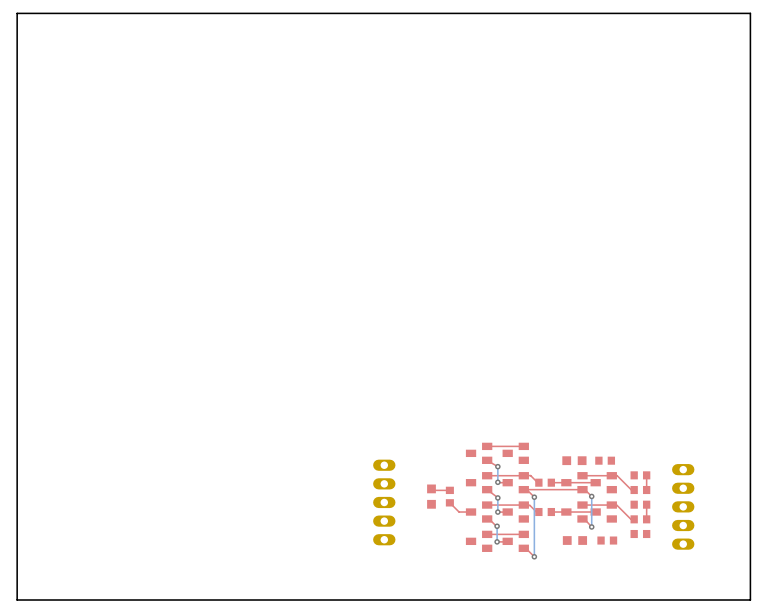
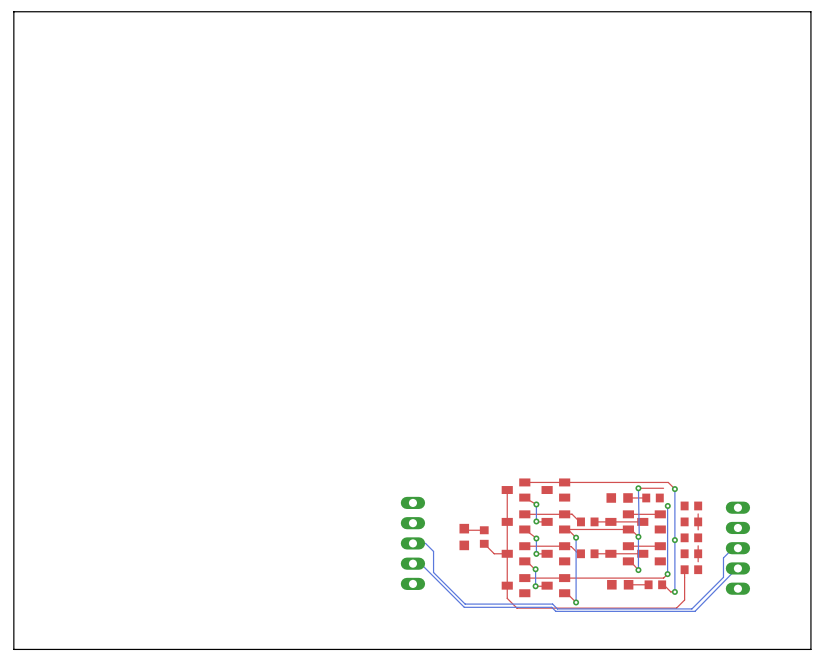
top track: none -> (564, 482) (668, 482) (674, 489)
bottom track: none -> (638, 488) (638, 536)
via: none -> (638, 488)
top track: none -> (663, 488) (638, 488)
bottom track: none -> (674, 489) (674, 591)
via: none -> (674, 489)
top track: none -> (507, 490) (507, 598) (516, 608) (676, 608) (684, 600) (684, 569)
top track: none -> (646, 497) (628, 497)
bottom track: none -> (667, 505) (667, 574)
via: none -> (667, 505)
part: none -> (691, 505)
top track: (611, 475) (617, 475) (631, 490) (634, 490) -> none
part: (640, 475) -> none
part: none -> (691, 521)
part: (640, 490) -> none
part: none -> (691, 537)
via: none -> (674, 540)
bottom track: none -> (412, 543) (425, 543) (433, 551) (433, 572) (465, 604) (552, 604) (557, 608) (691, 608) (723, 577) (723, 557) (733, 548) (739, 545)
part: (640, 504) -> none
top track: (611, 505) (617, 505) (631, 519) (634, 519) -> none
part: none -> (691, 553)
part: (640, 519) -> none
bottom track: none -> (412, 563) (420, 563) (464, 607) (551, 607) (555, 611) (695, 611) (739, 566)
part: none -> (691, 569)
top track: none -> (667, 574) (663, 578) (564, 578)
via: none -> (667, 574)
part: (640, 534) -> none
top track: none -> (648, 584) (628, 584)
top track: none -> (662, 584) (670, 591) (674, 591)
via: none -> (674, 591)

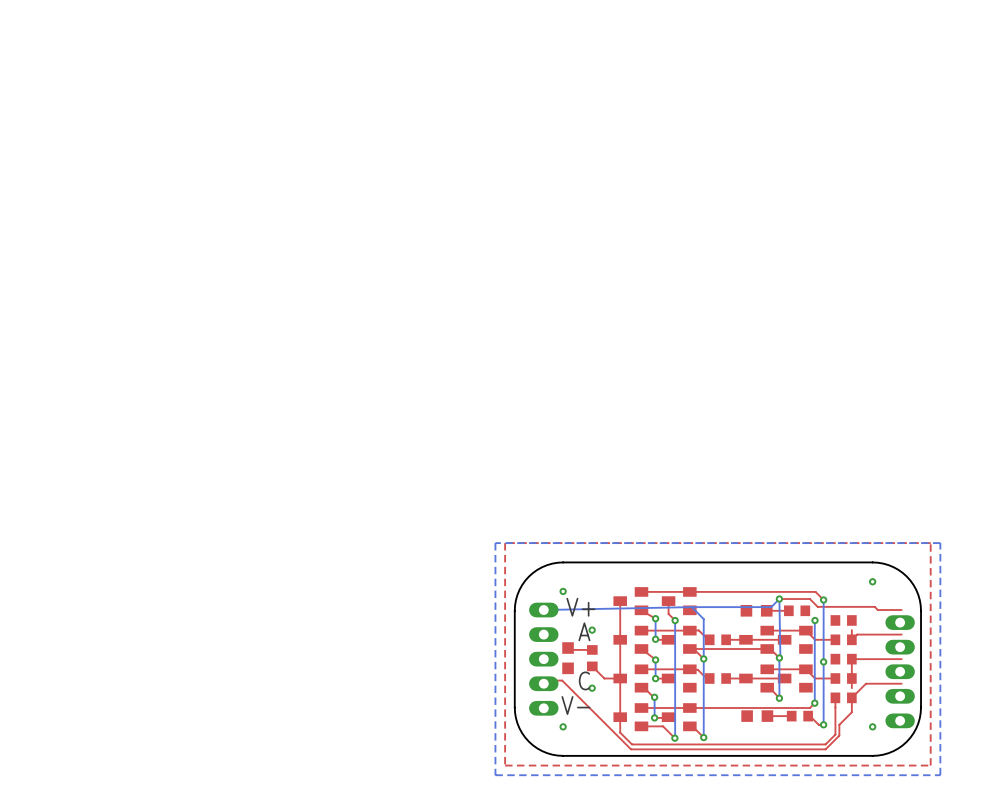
board edge: (810, 11) (13, 11) (13, 649) (810, 649) (810, 11) -> none
top zone outline: none -> (930, 543) (930, 765) (505, 765) (505, 543) (930, 543)
bottom zone outline: none -> (940, 543) (940, 775) (495, 775) (495, 543) (940, 543)
board edge: none -> (872, 562) (563, 562) (542, 567) (525, 580) (517, 594) (515, 605) (514, 707) (519, 728) (532, 745) (547, 753) (557, 755) (872, 755) (893, 751) (910, 737) (919, 718) (920, 605) (913, 585) (902, 572) (888, 565) (872, 562)
via: none -> (872, 581)
via: none -> (563, 591)
bottom track: none -> (779, 599) (771, 607) (691, 607)
top track: none -> (809, 599) (817, 606) (874, 606) (877, 610) (901, 610)
top track: none -> (668, 601) (668, 613) (675, 620)
bottom track: none -> (691, 607) (543, 610)
bottom track: none -> (691, 607) (703, 619) (703, 658)
text: none -> V+ (580, 607)
bottom track: none -> (675, 620) (674, 738)
via: none -> (675, 620)
via: none -> (592, 630)
top track: none -> (805, 630) (815, 639) (835, 639)
text: none -> A (584, 631)
top track: (698, 521) (698, 529) -> (851, 639) (857, 634) (901, 634)
top track: none -> (901, 659) (851, 659) (851, 668)
bottom track: (412, 543) (425, 543) (433, 551) (433, 572) (465, 604) (552, 604) (557, 608) (691, 608) (723, 577) (723, 557) (733, 548) (739, 545) -> none
part position: (412, 543) -> (543, 659)
top track: none -> (805, 669) (815, 678) (835, 678)
text: none -> C (584, 680)
top track: none -> (901, 683) (865, 683) (851, 697) (851, 712) (839, 724) (839, 735) (825, 749) (631, 749) (562, 680) (535, 680) (543, 683)
via: none -> (592, 688)
bottom track: (412, 563) (420, 563) (464, 607) (551, 607) (555, 611) (695, 611) (739, 566) -> none
text: none -> V- (575, 705)
via: none -> (563, 726)
top track: none -> (641, 726) (663, 726) (675, 738)
via: none -> (872, 726)
via: none -> (674, 738)

